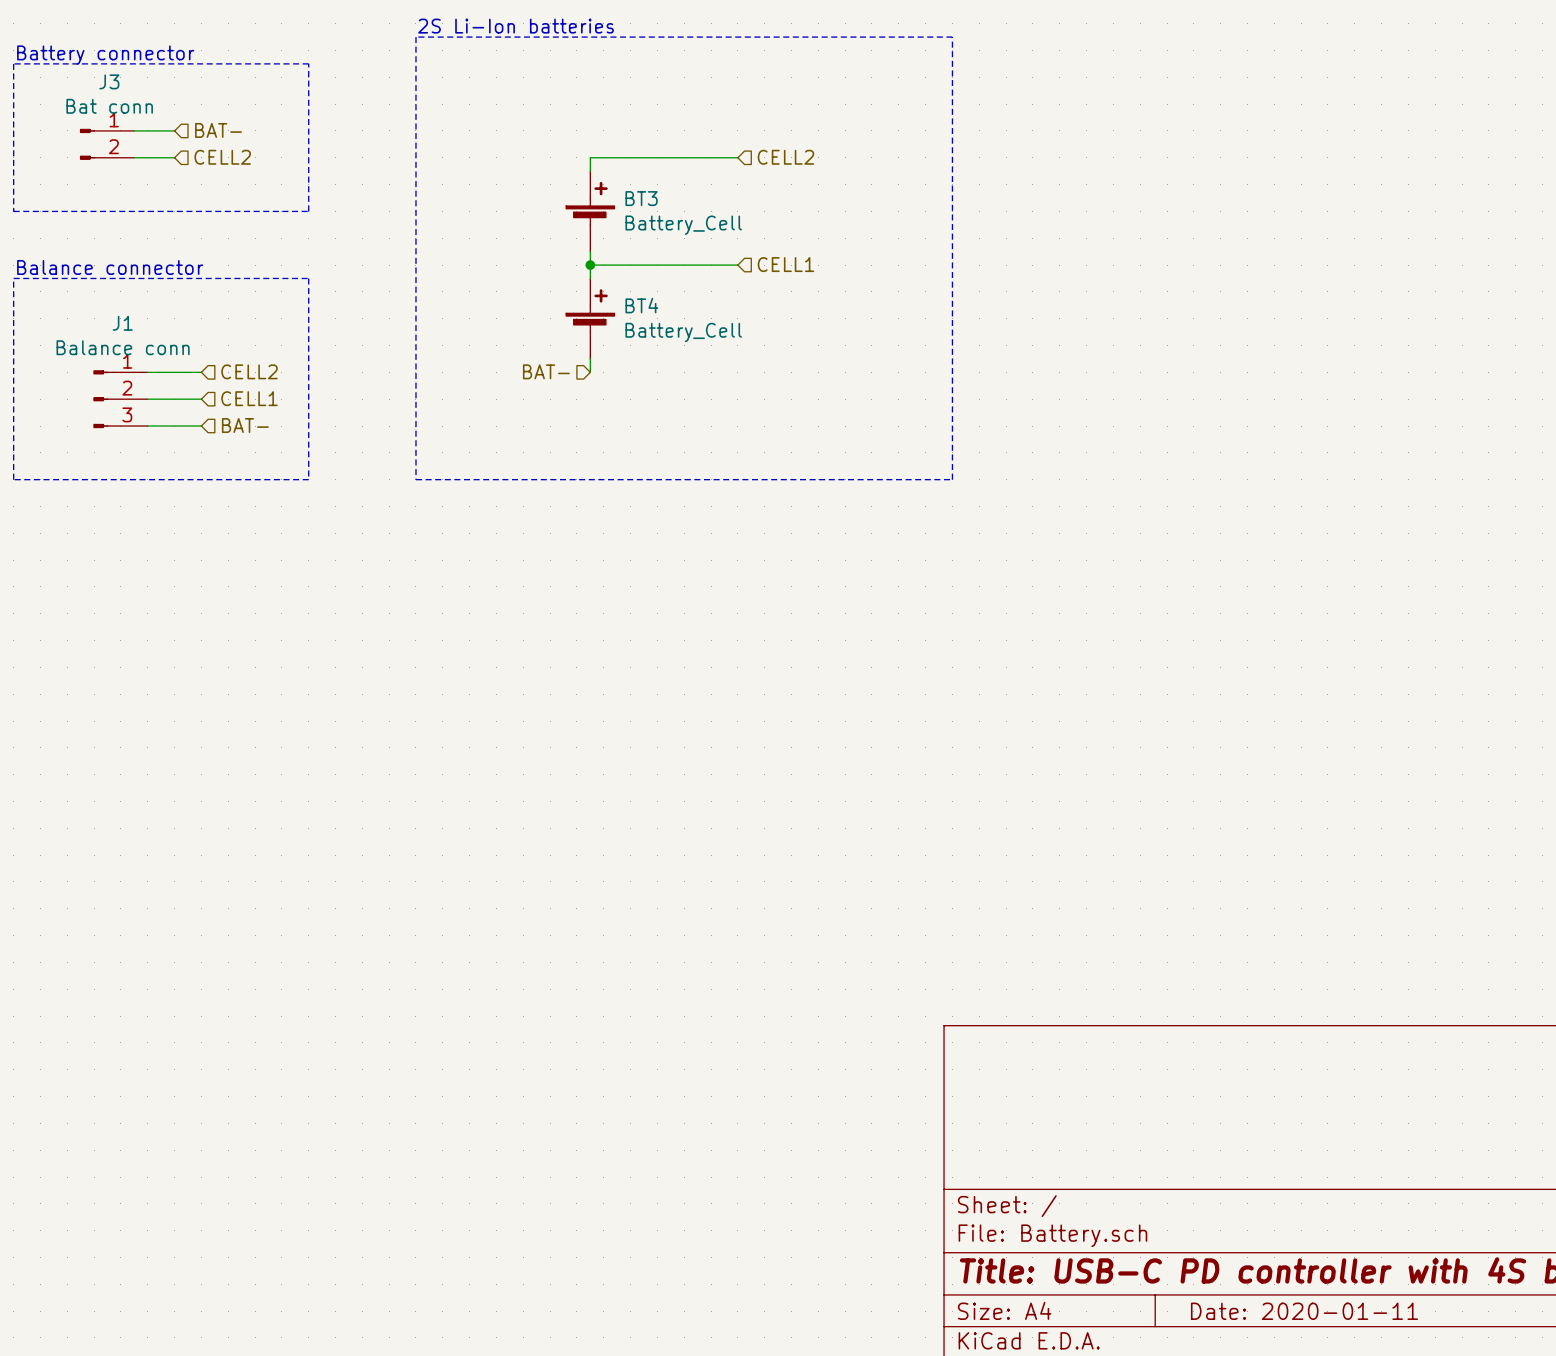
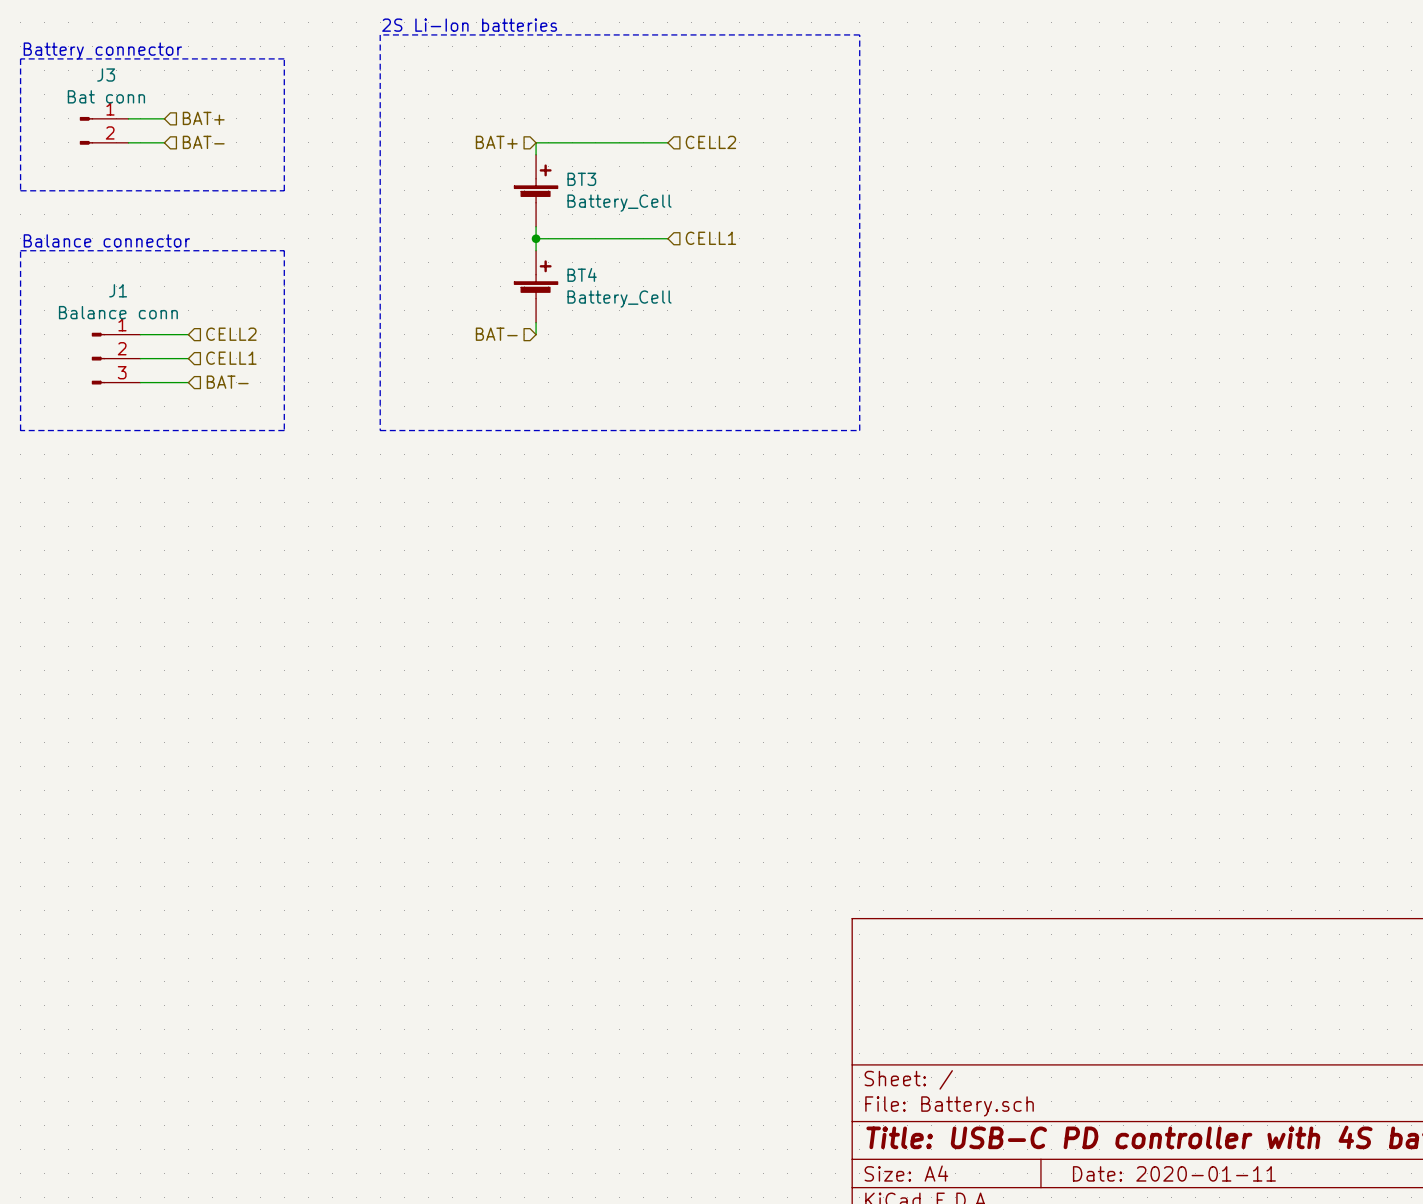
hierarchical label: BAT- (218, 130) -> BAT+ (203, 118)
hierarchical label: CELL2 (222, 157) -> BAT- (203, 142)
hierarchical label: none -> BAT+ (496, 142)

